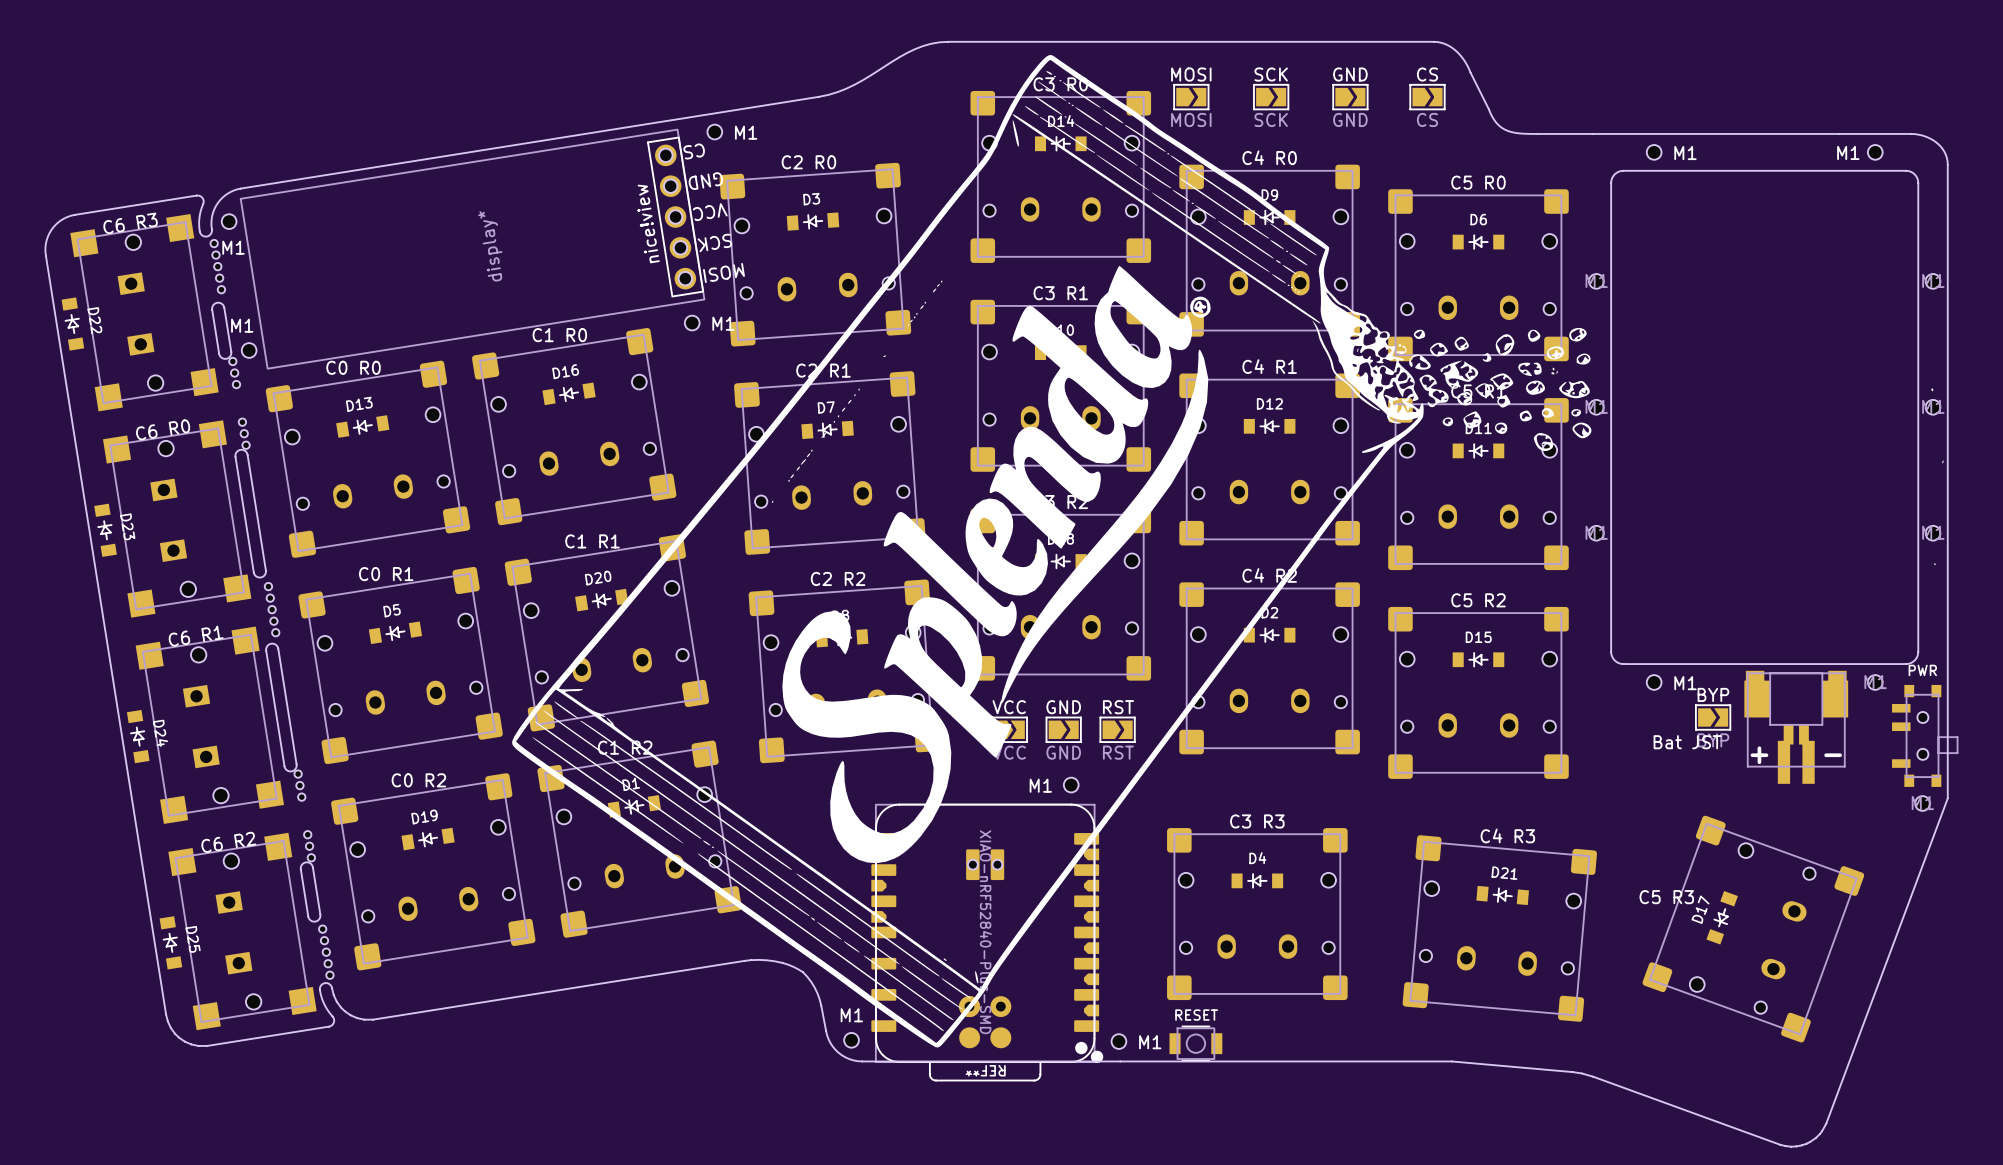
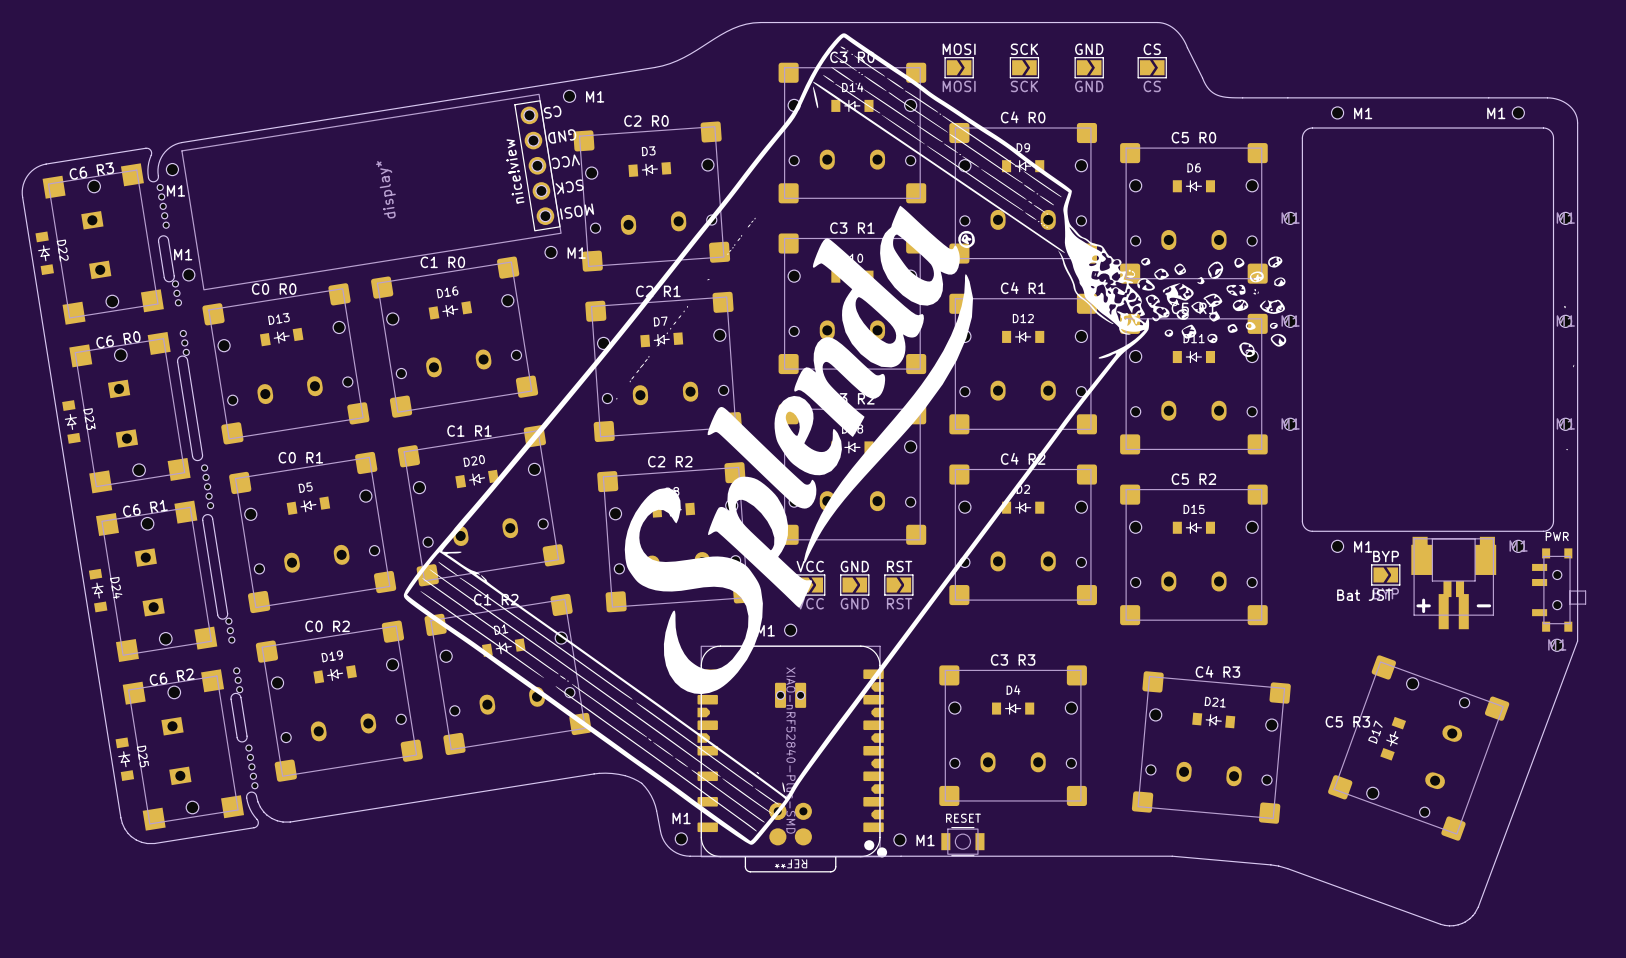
M1 position: (1071, 785) -> (790, 630)

